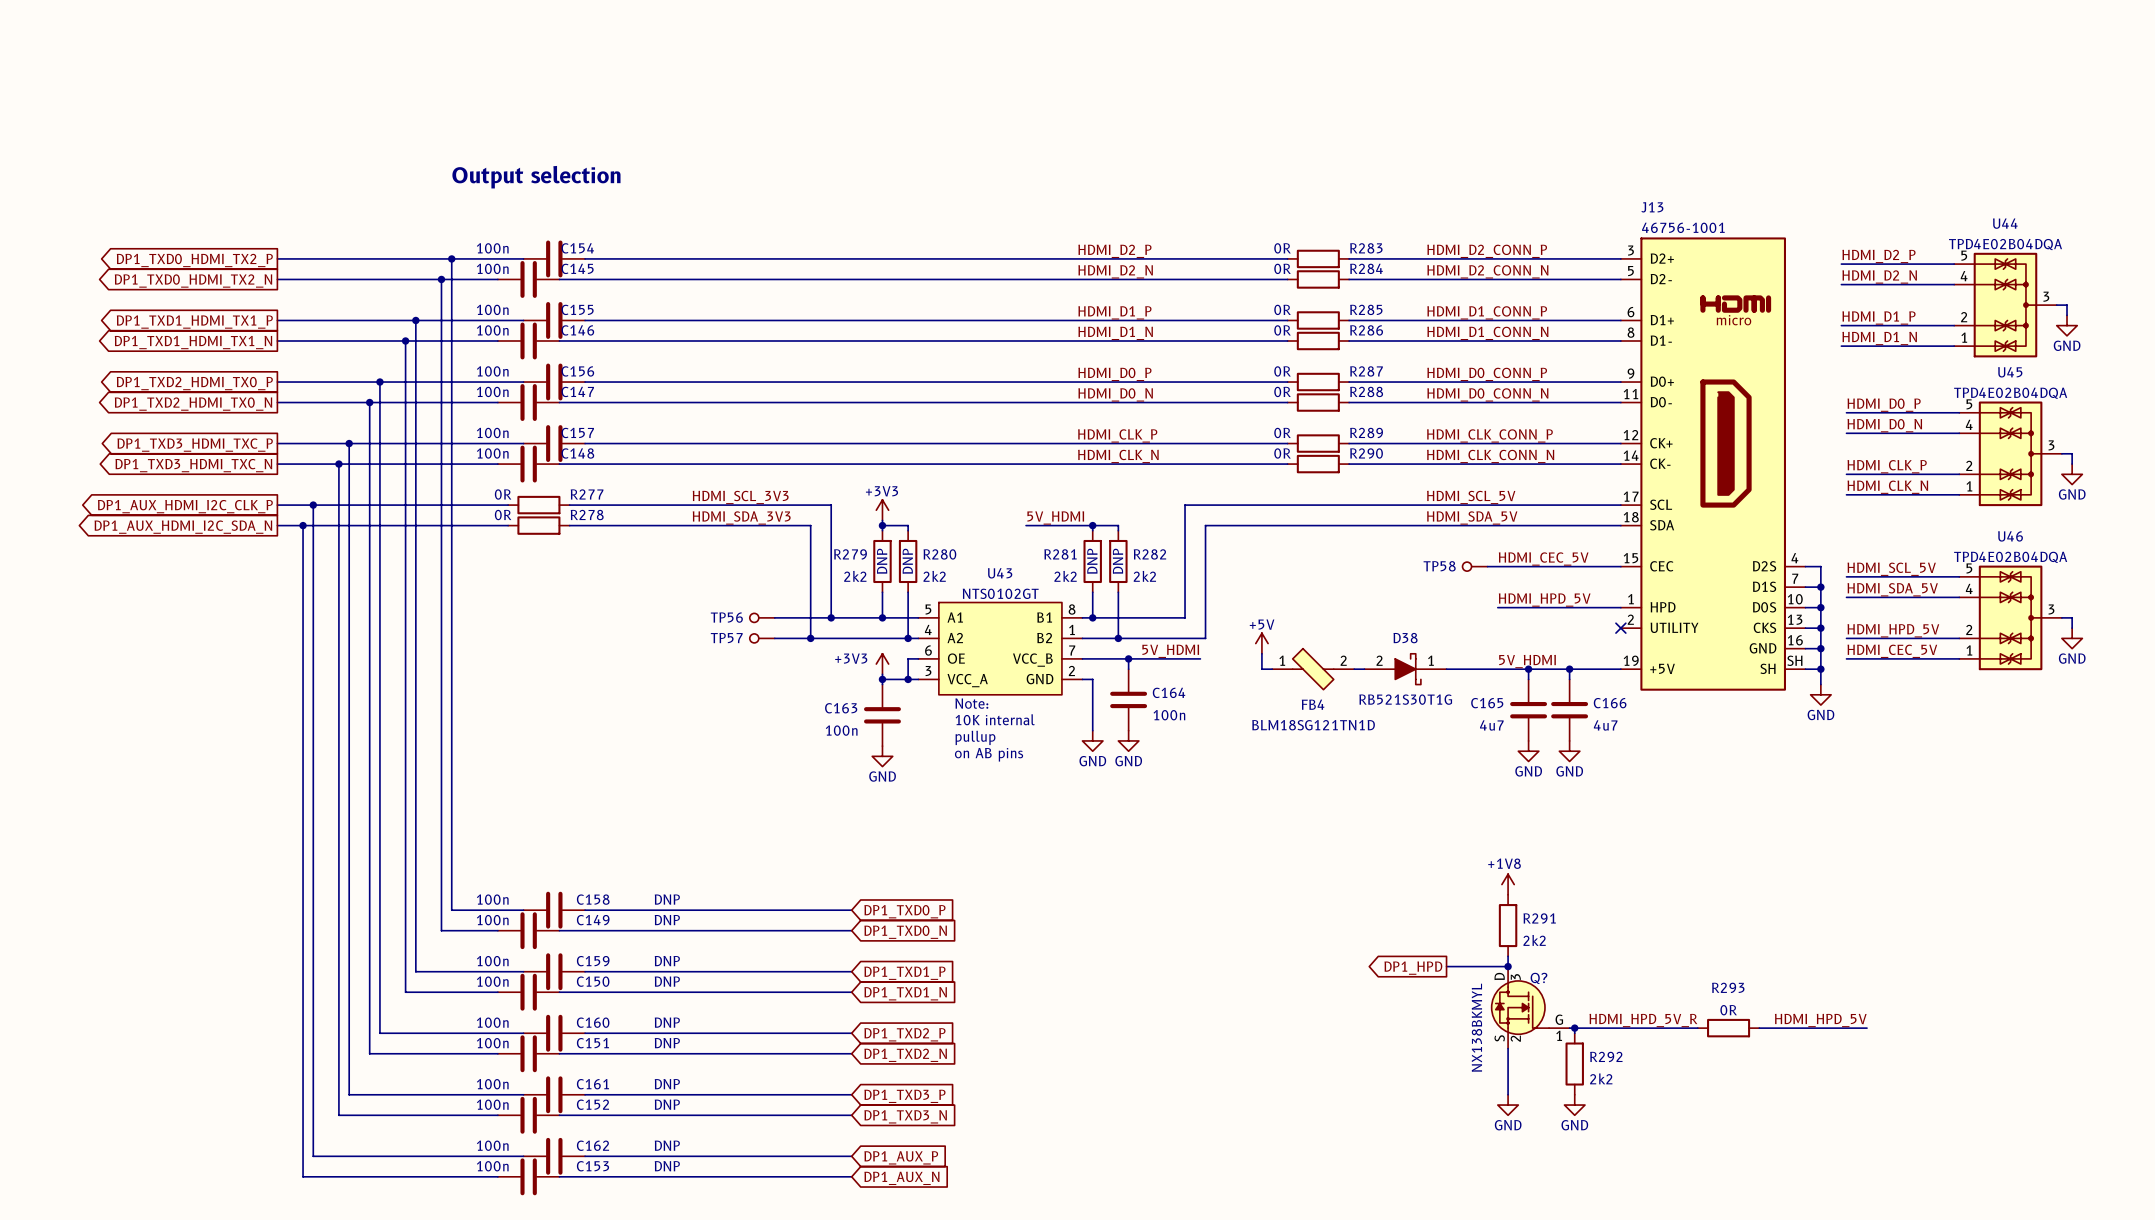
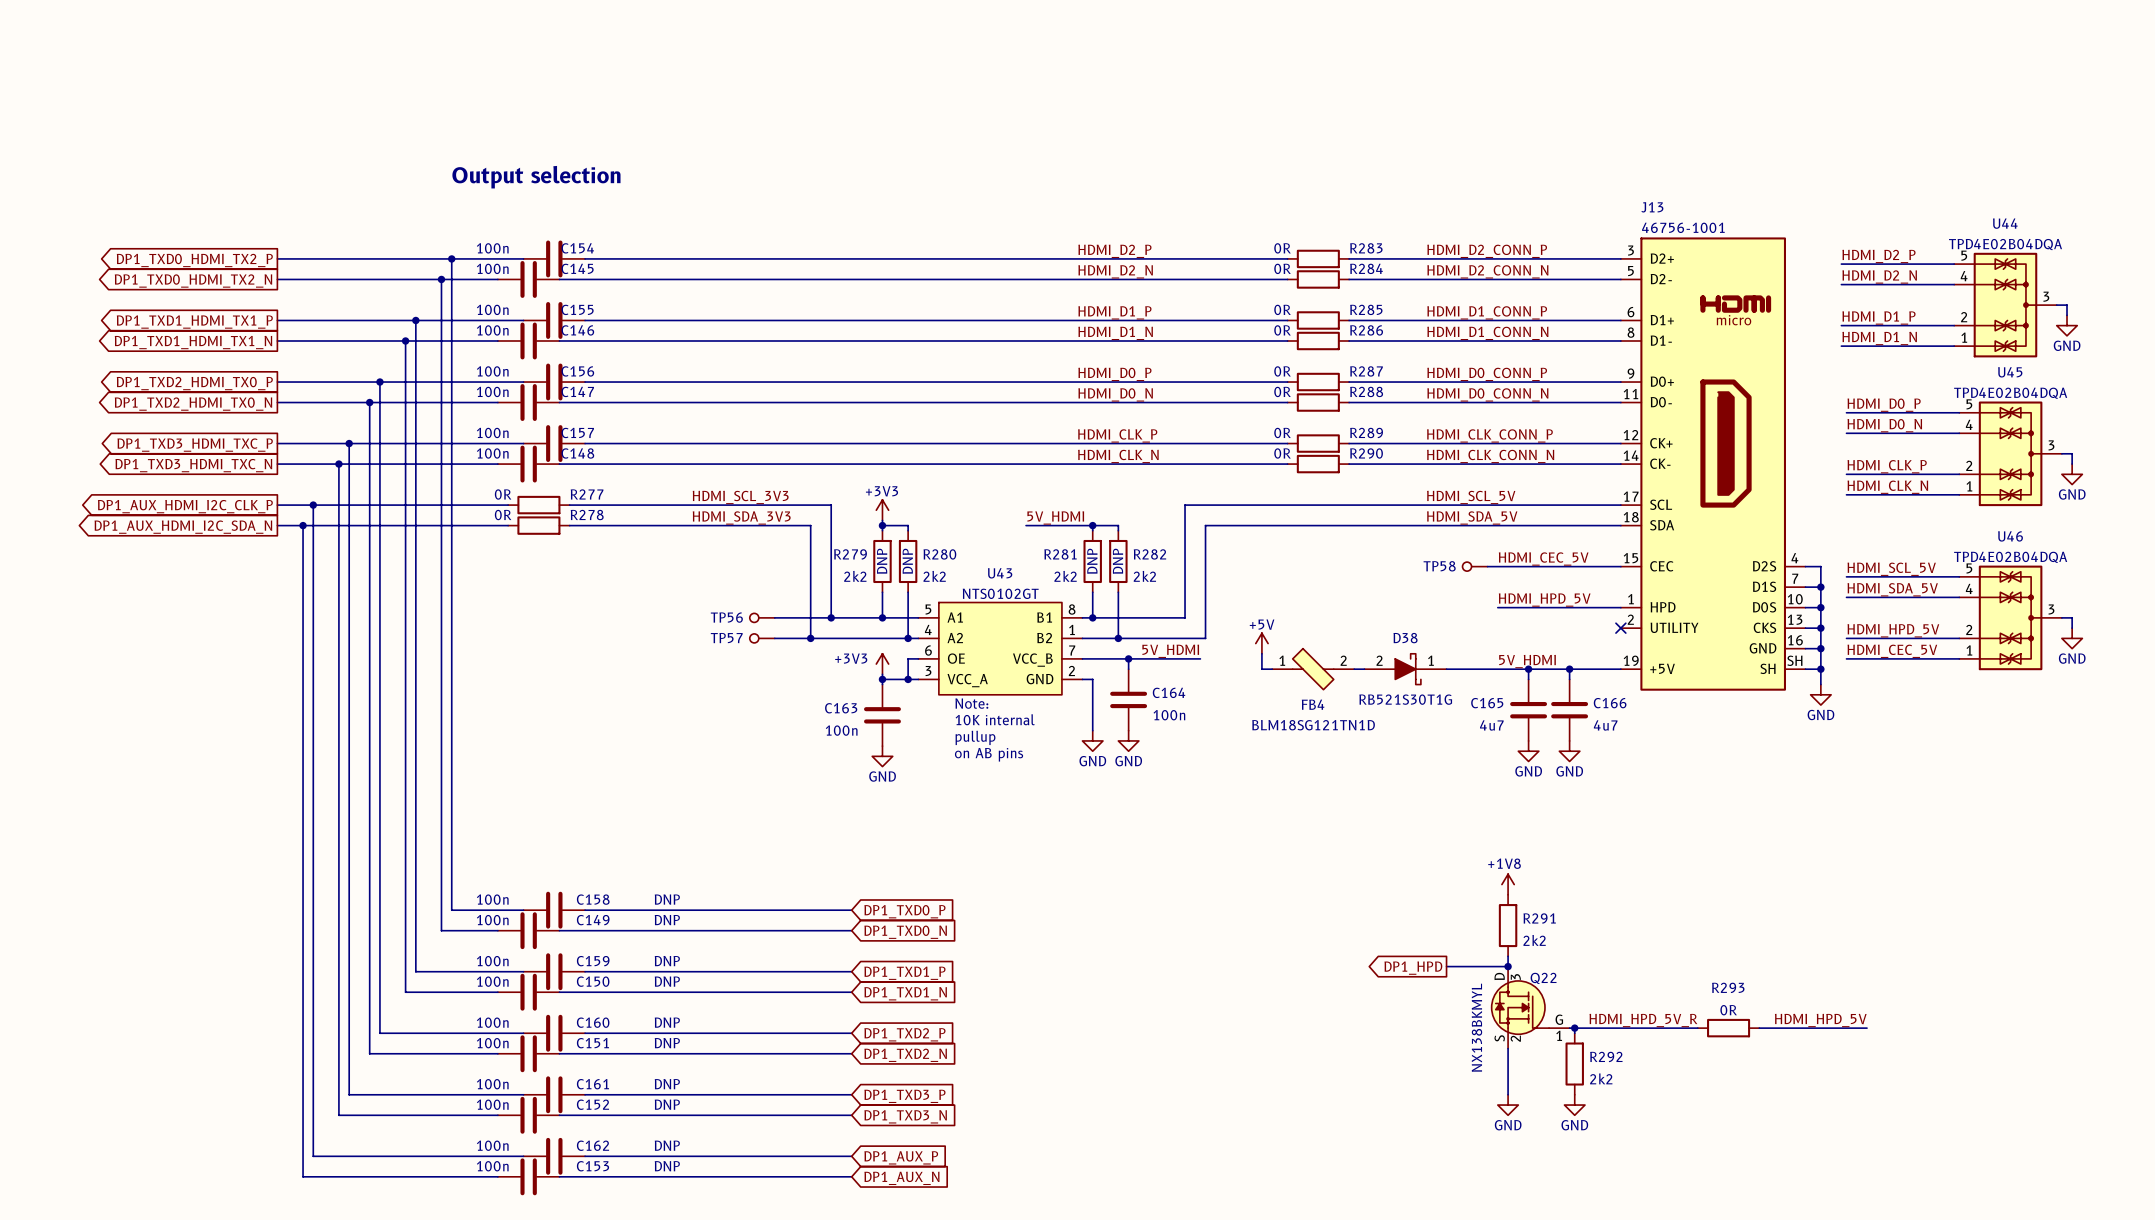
Q? name: Q? (1539, 978) -> Q22 (1543, 978)

